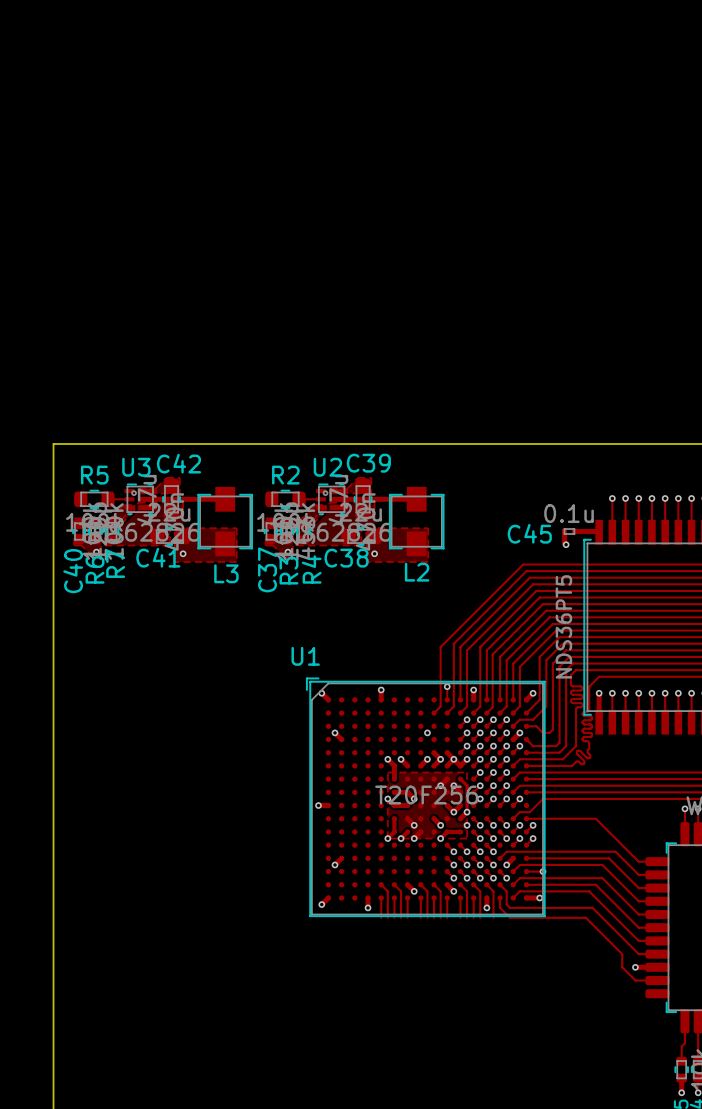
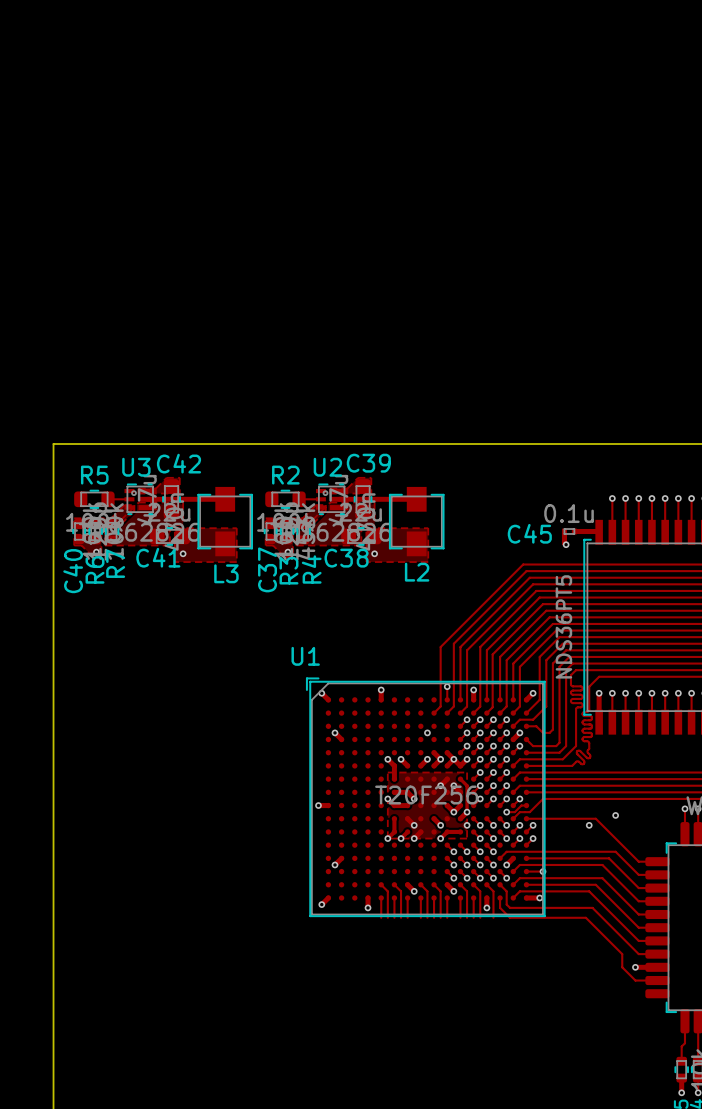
track: none -> (526, 805) (521, 805) (514, 812) (506, 812)
via: none -> (506, 812)
via: none -> (615, 815)
via: none -> (589, 825)

